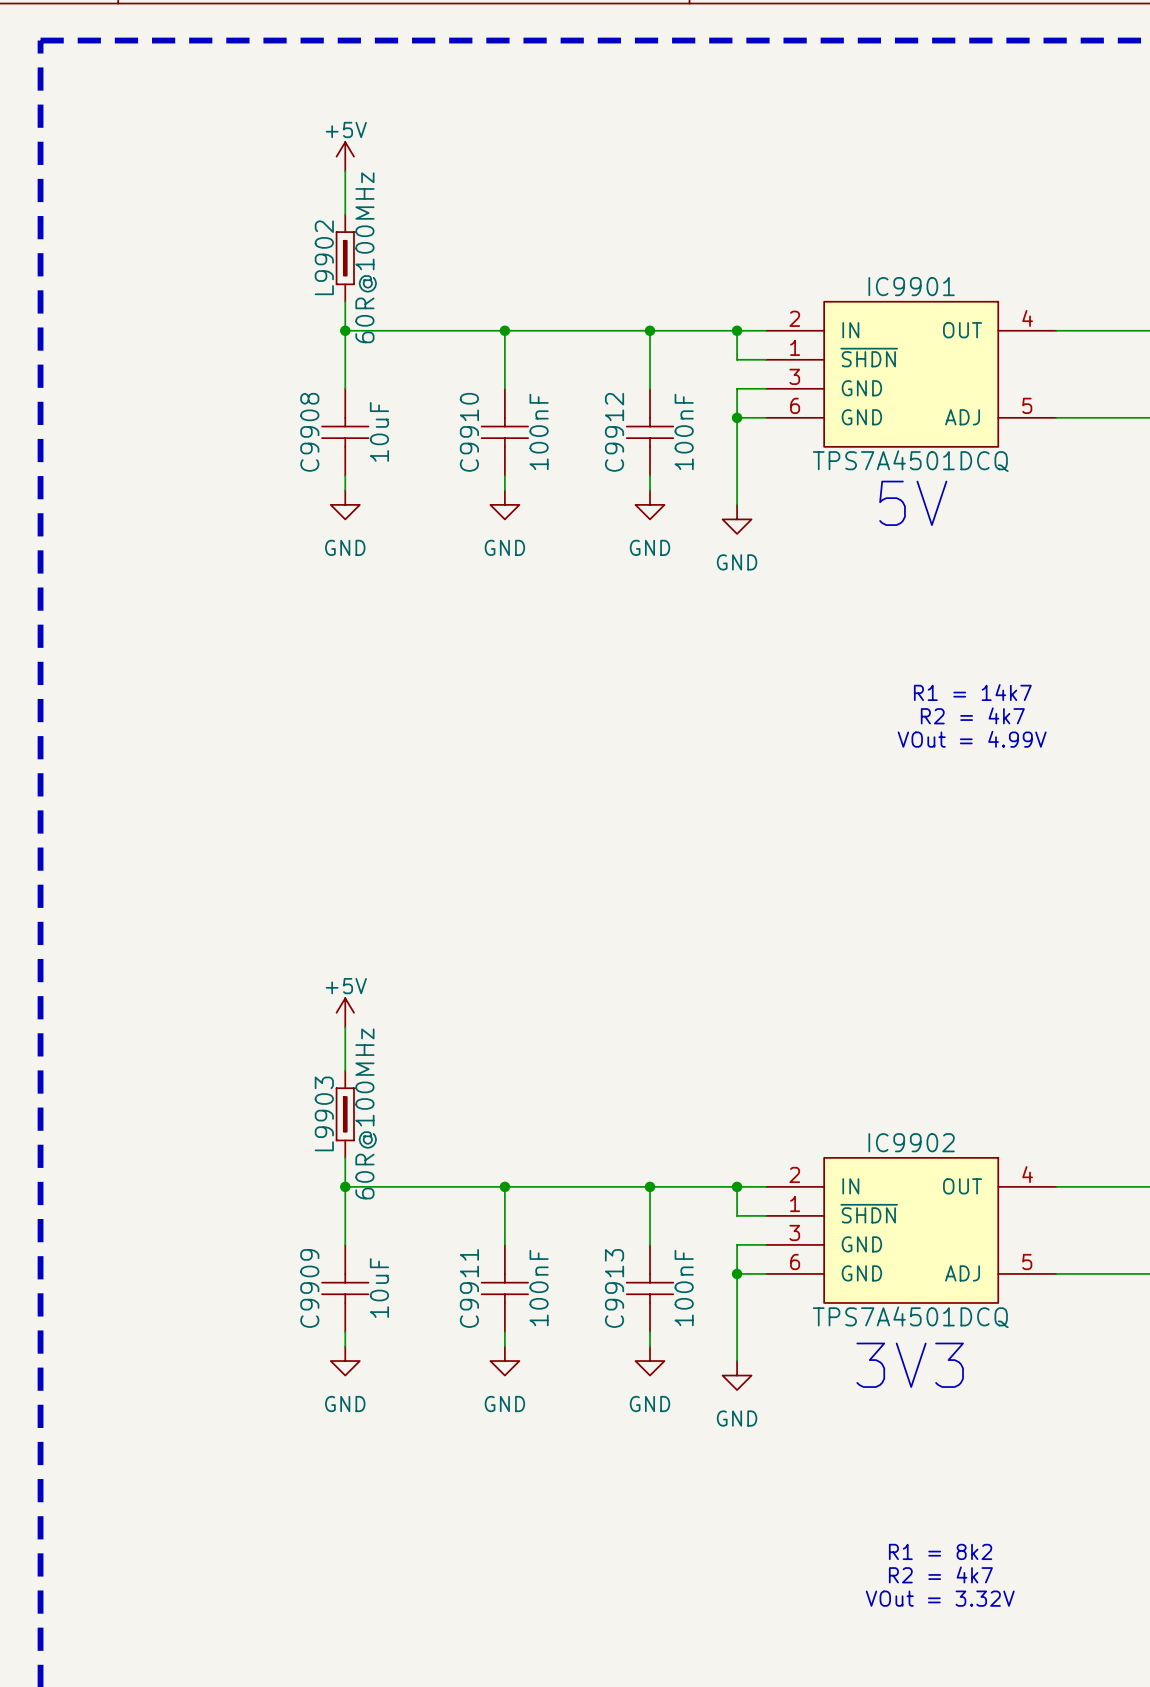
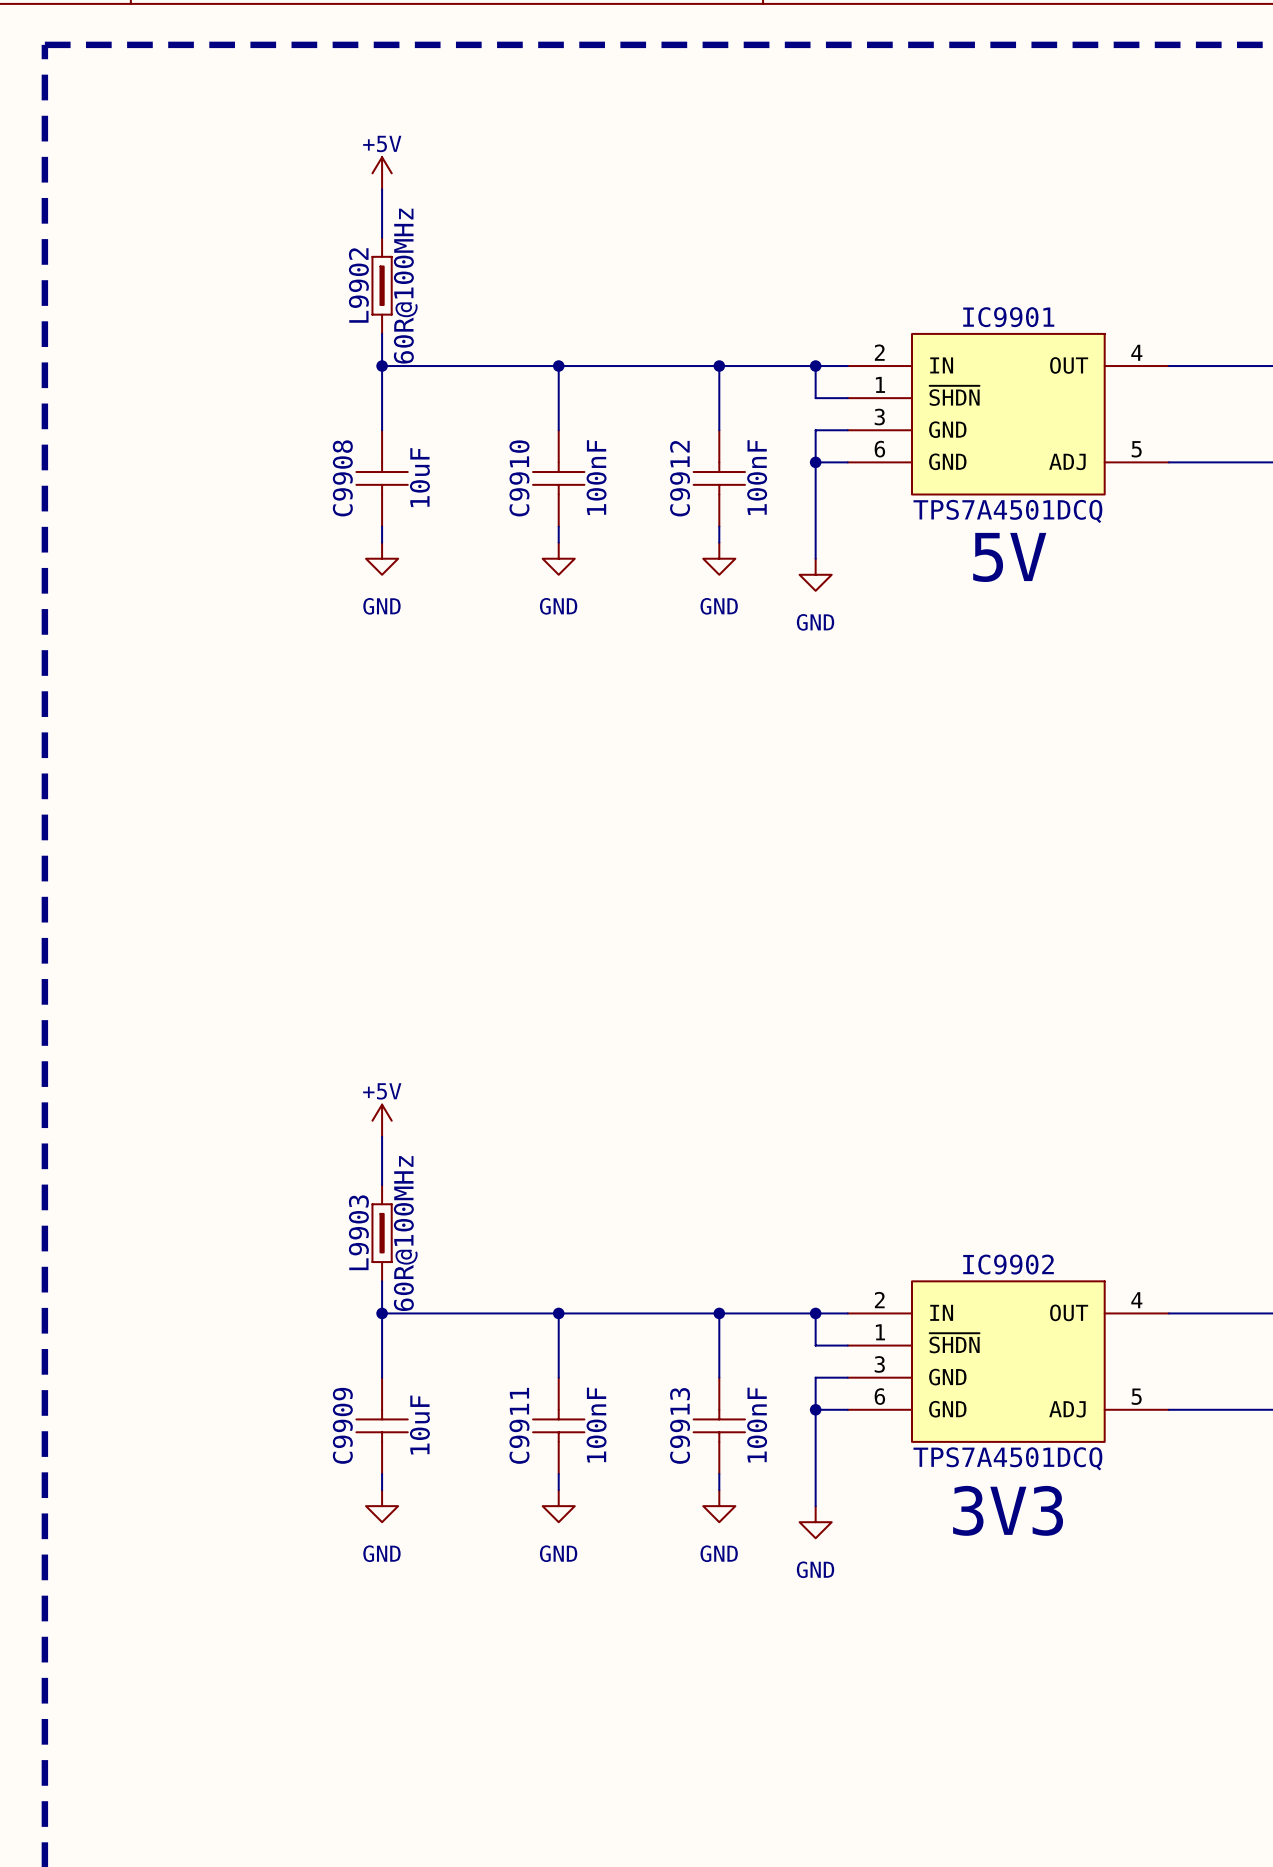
text: R1 = 14k7 (972, 692) -> none
text: R2 = 4k7 (972, 715) -> none
text: VOut = 4.99V (972, 739) -> none
text: R1 = 8k2 (940, 1551) -> none
text: R2 = 4k7 (940, 1574) -> none
text: VOut = 3.32V (940, 1598) -> none

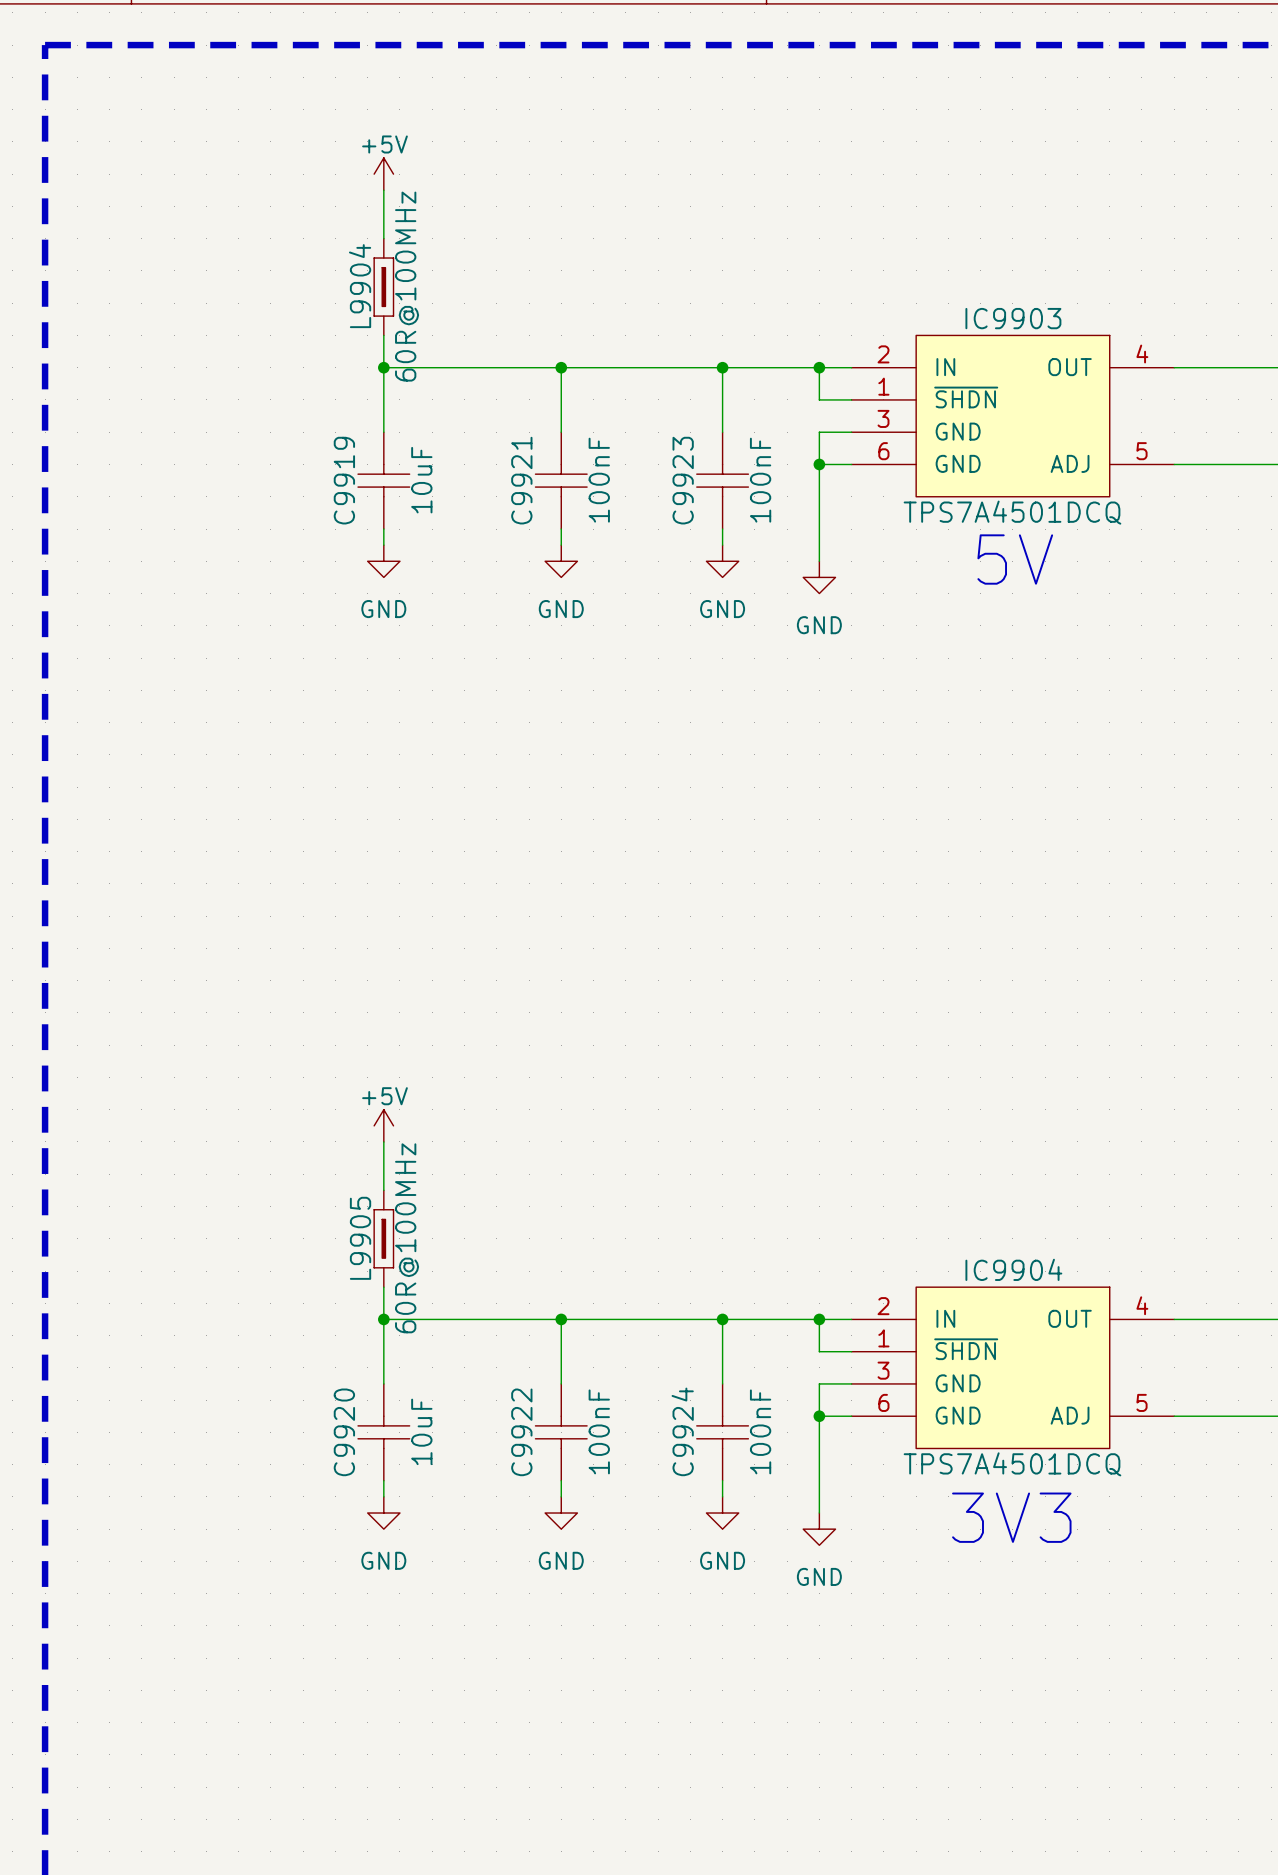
L9902 name: L9902 (358, 285) -> L9904 (360, 286)
IC9901 name: IC9901 (1008, 317) -> IC9903 (1013, 318)
C9908 name: C9908 (342, 478) -> C9919 (344, 480)
C9910 name: C9910 (519, 478) -> C9921 (521, 480)
C9912 name: C9912 (680, 478) -> C9923 (683, 480)
L9903 name: L9903 (358, 1232) -> L9905 (360, 1238)
IC9902 name: IC9902 (1008, 1264) -> IC9904 (1013, 1269)
C9909 name: C9909 (342, 1425) -> C9920 (344, 1432)
C9911 name: C9911 (519, 1425) -> C9922 (521, 1432)
C9913 name: C9913 (680, 1425) -> C9924 (682, 1431)

